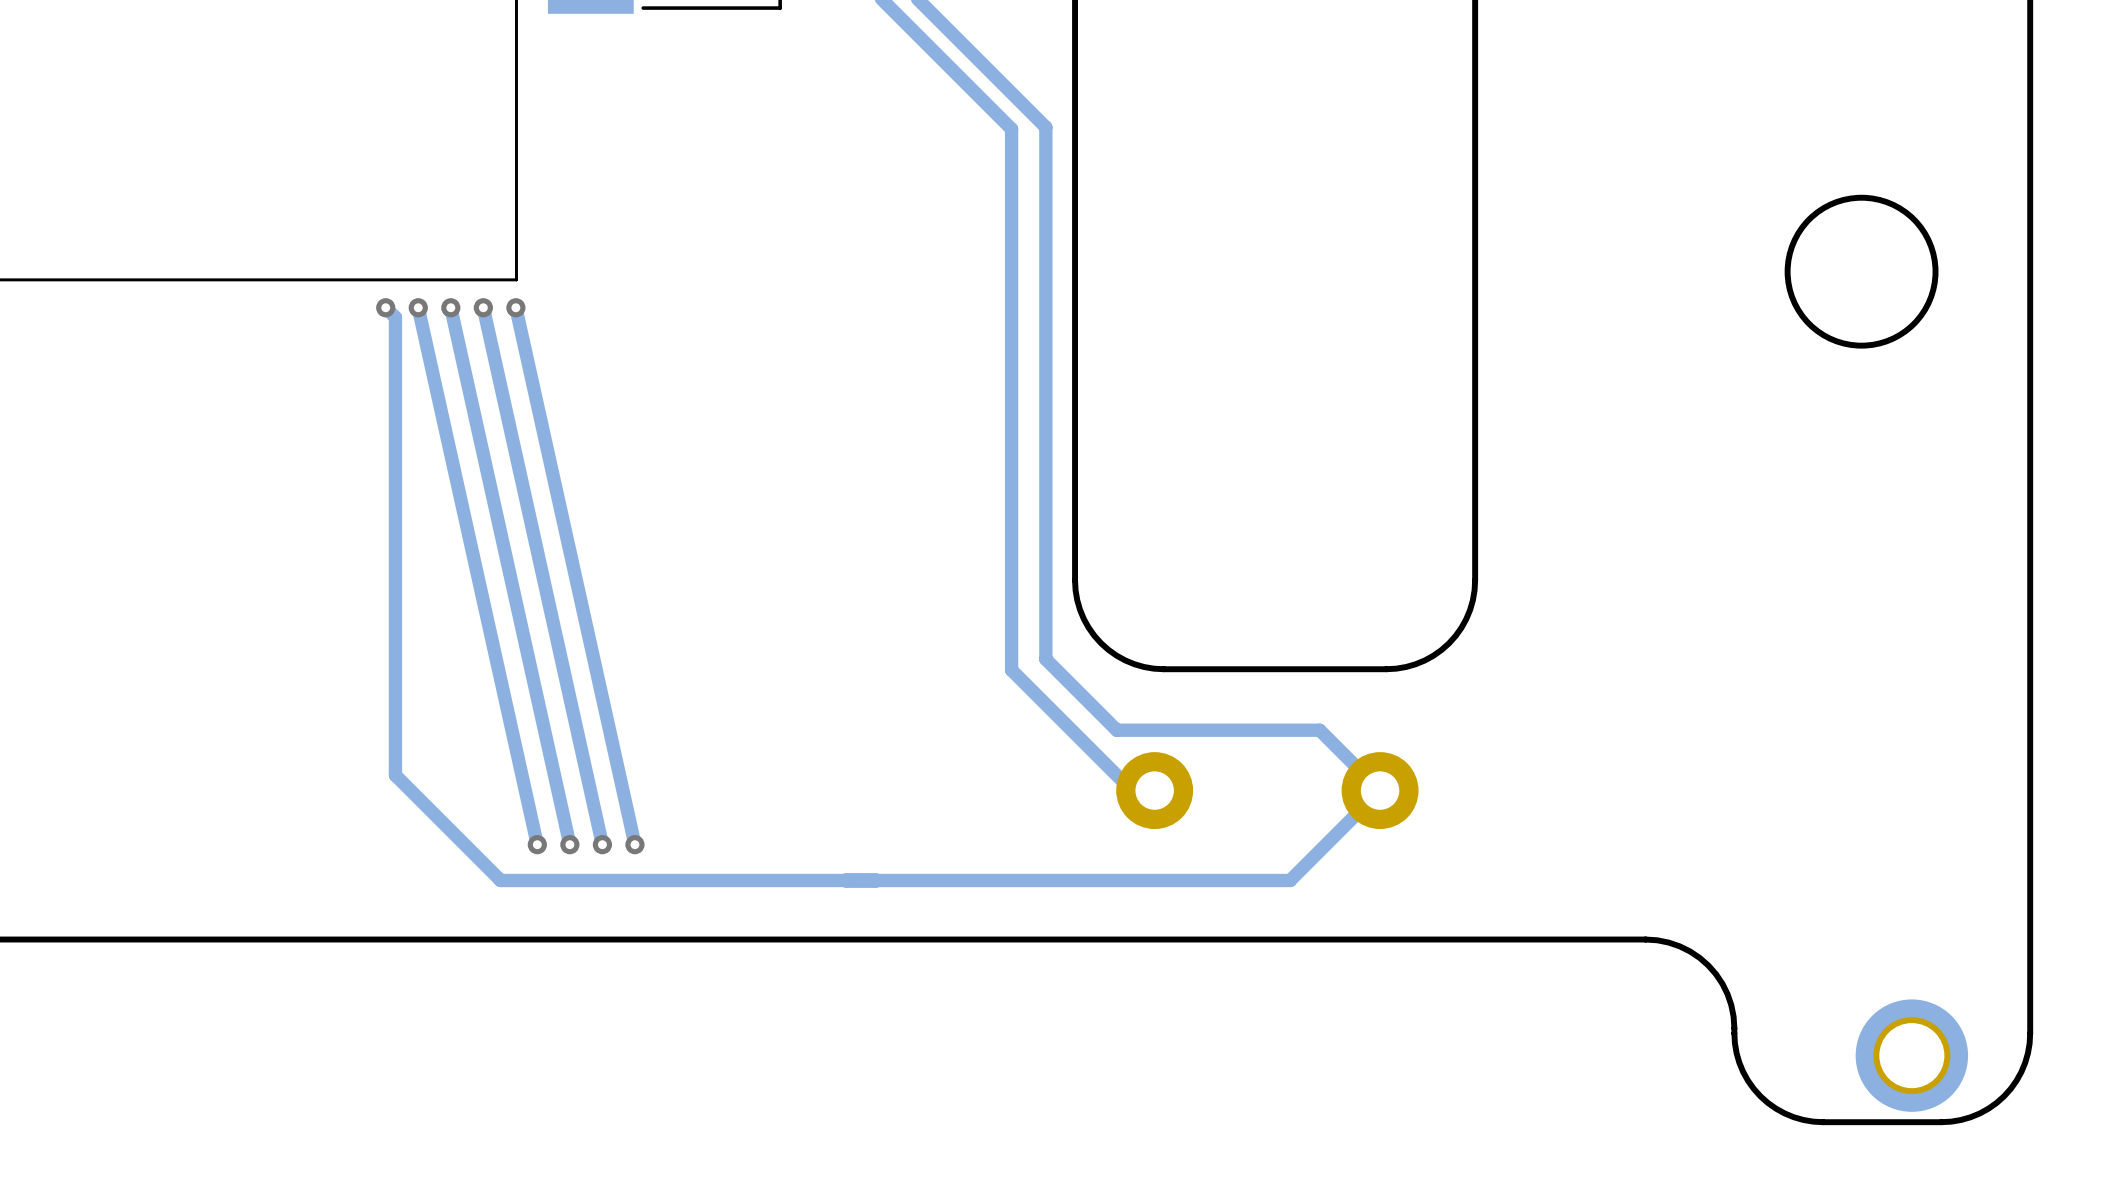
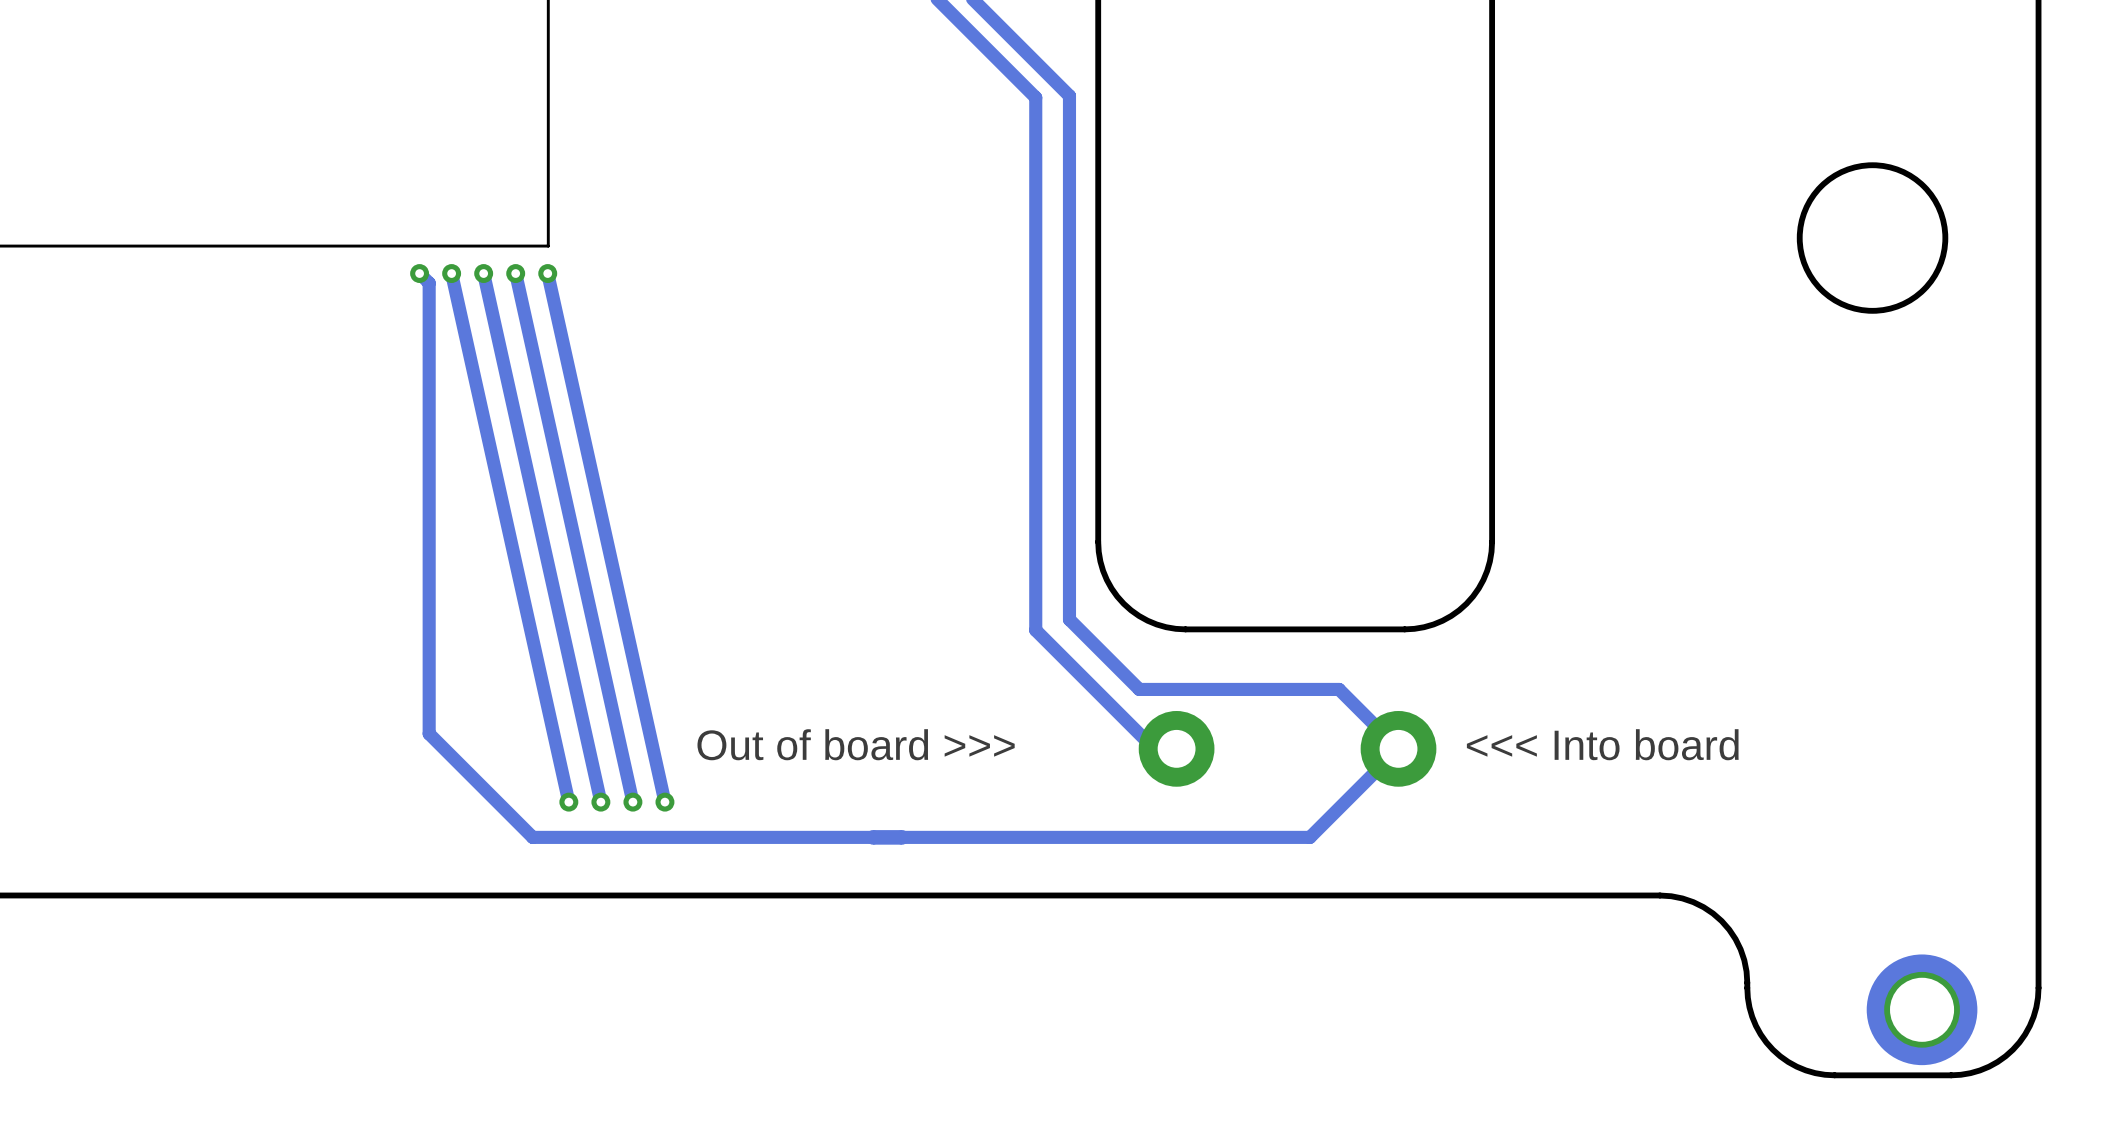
text: none -> Out of board >>> (856, 744)
text: none -> <<< Into board (1602, 744)

